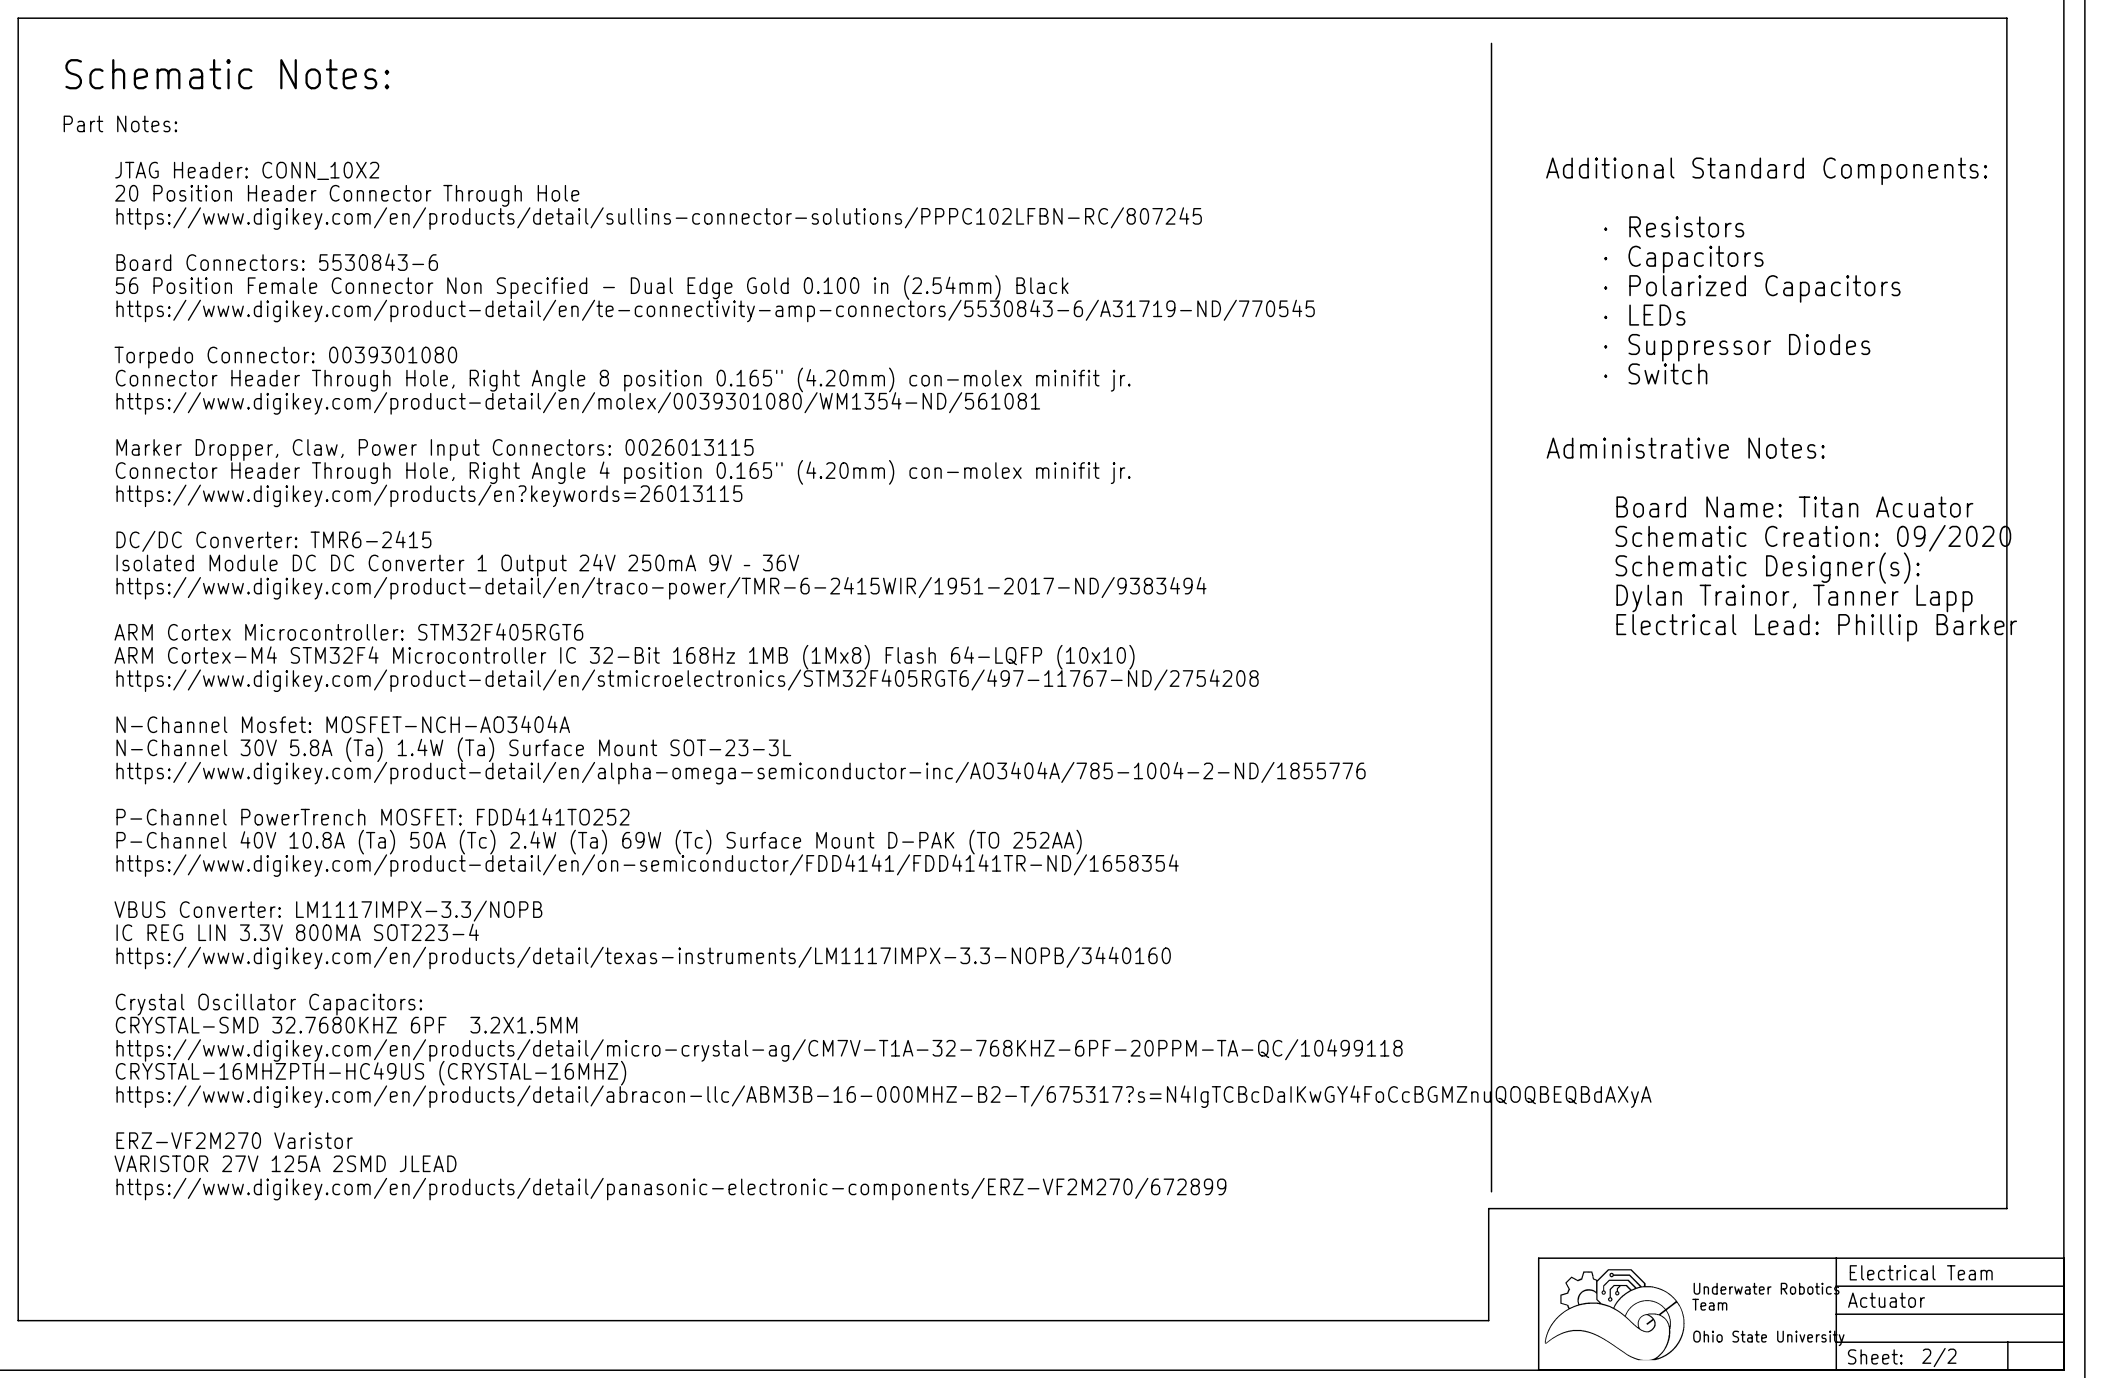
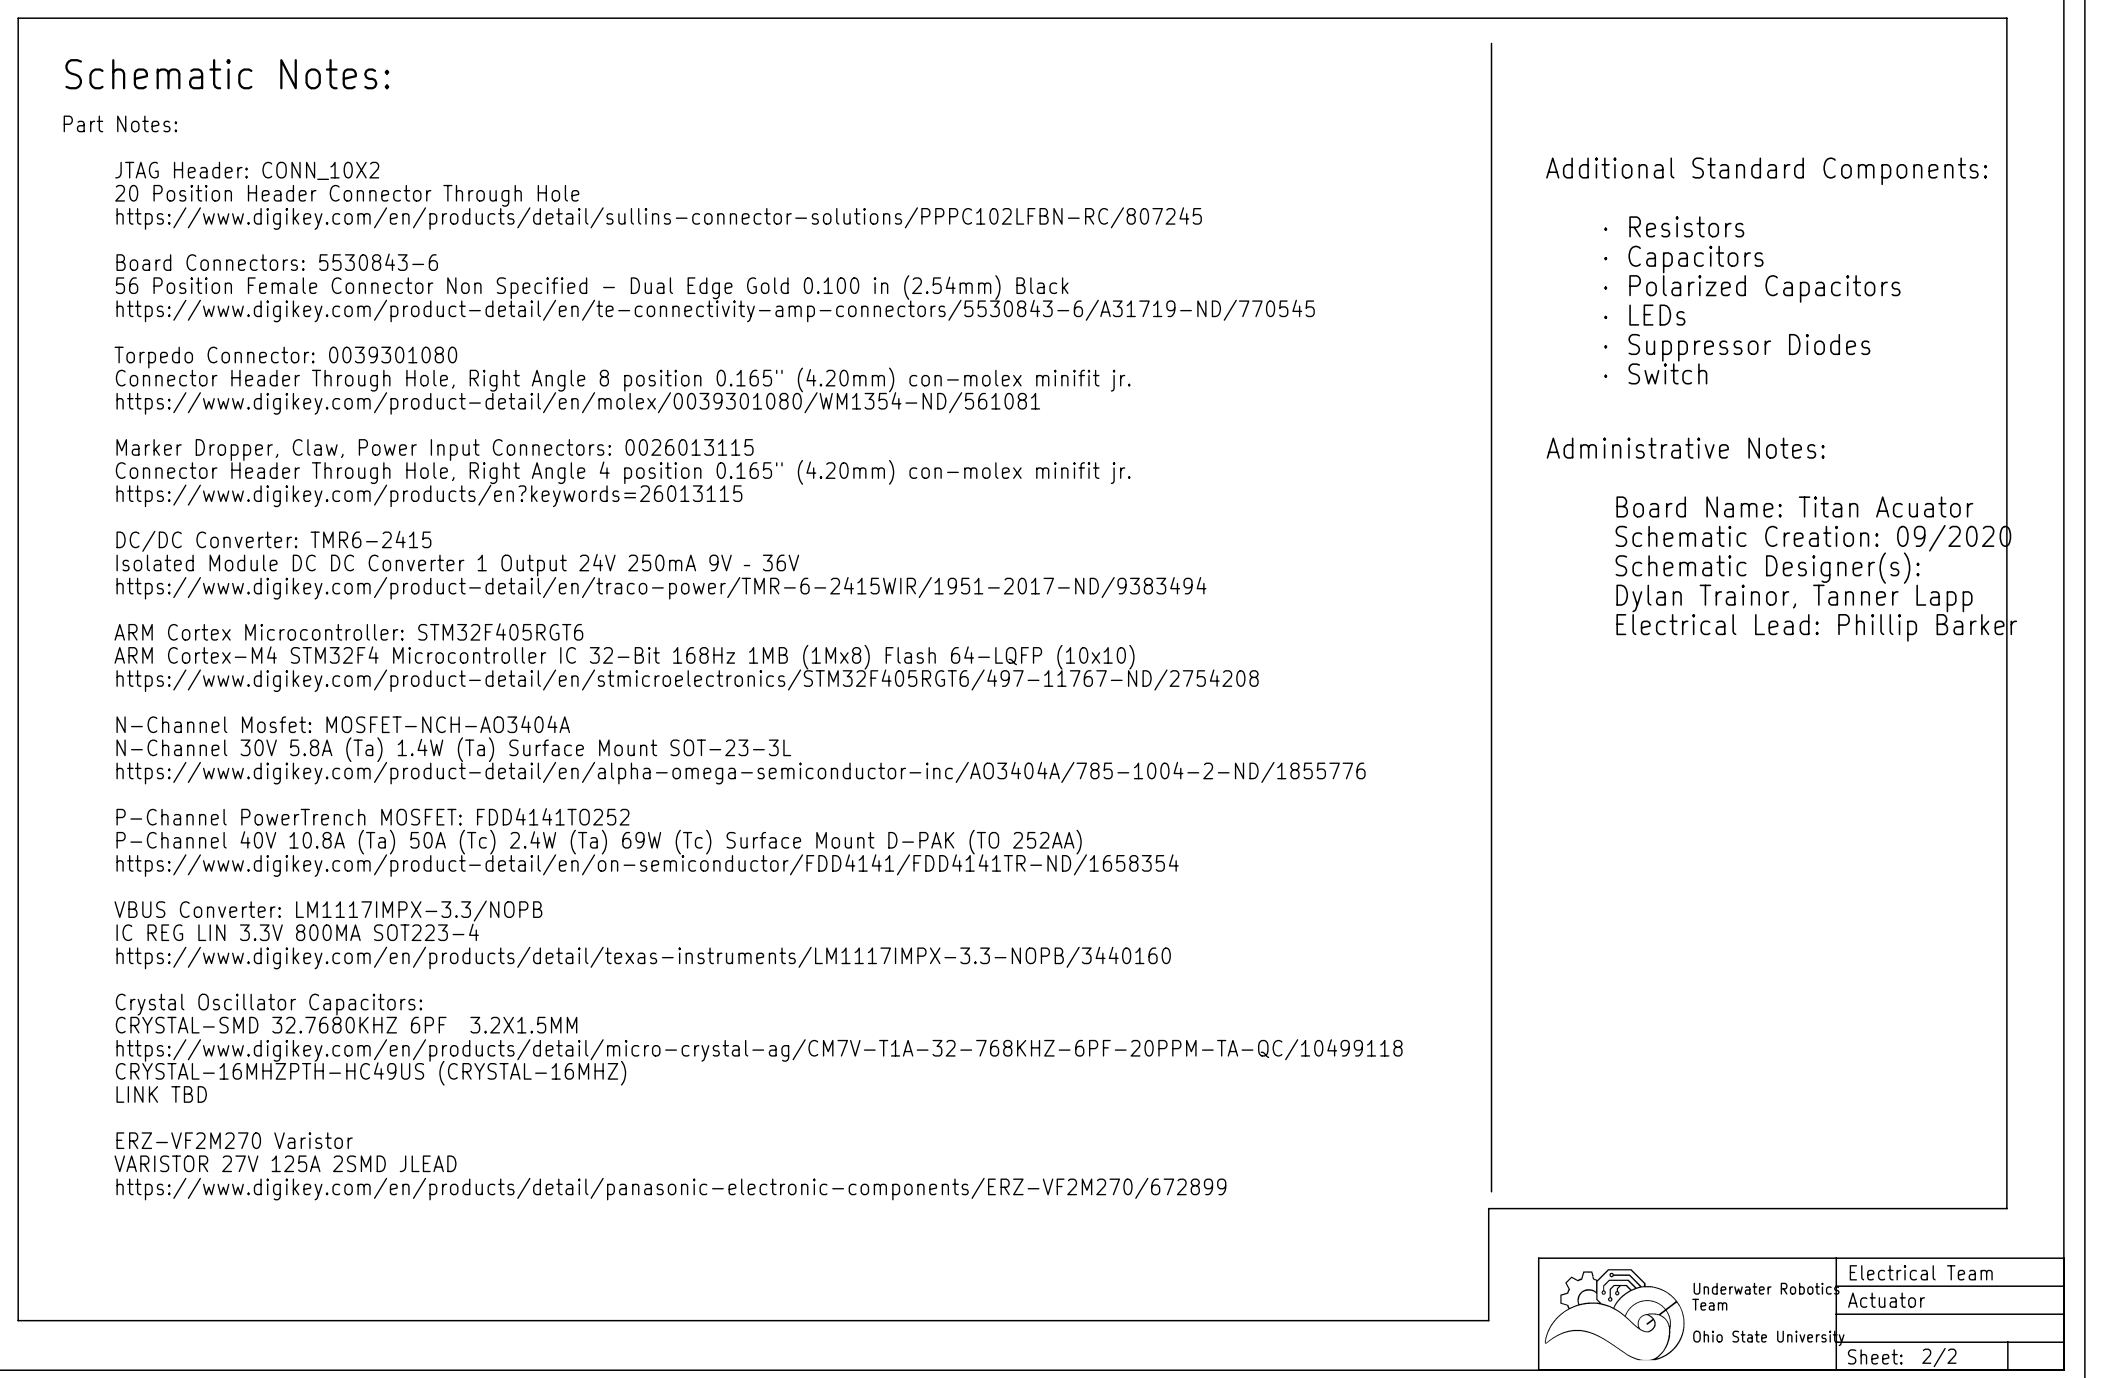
text: https://www.digikey.com/en/products/detail/abracon-llc/ABM3B-16-000MHZ-B2-T/675317?s=N4IgTCBcDaIKwGY4FoCcBGMZnuQOQBEQBdAXyA (883, 1096) -> LINK TBD (161, 1094)

